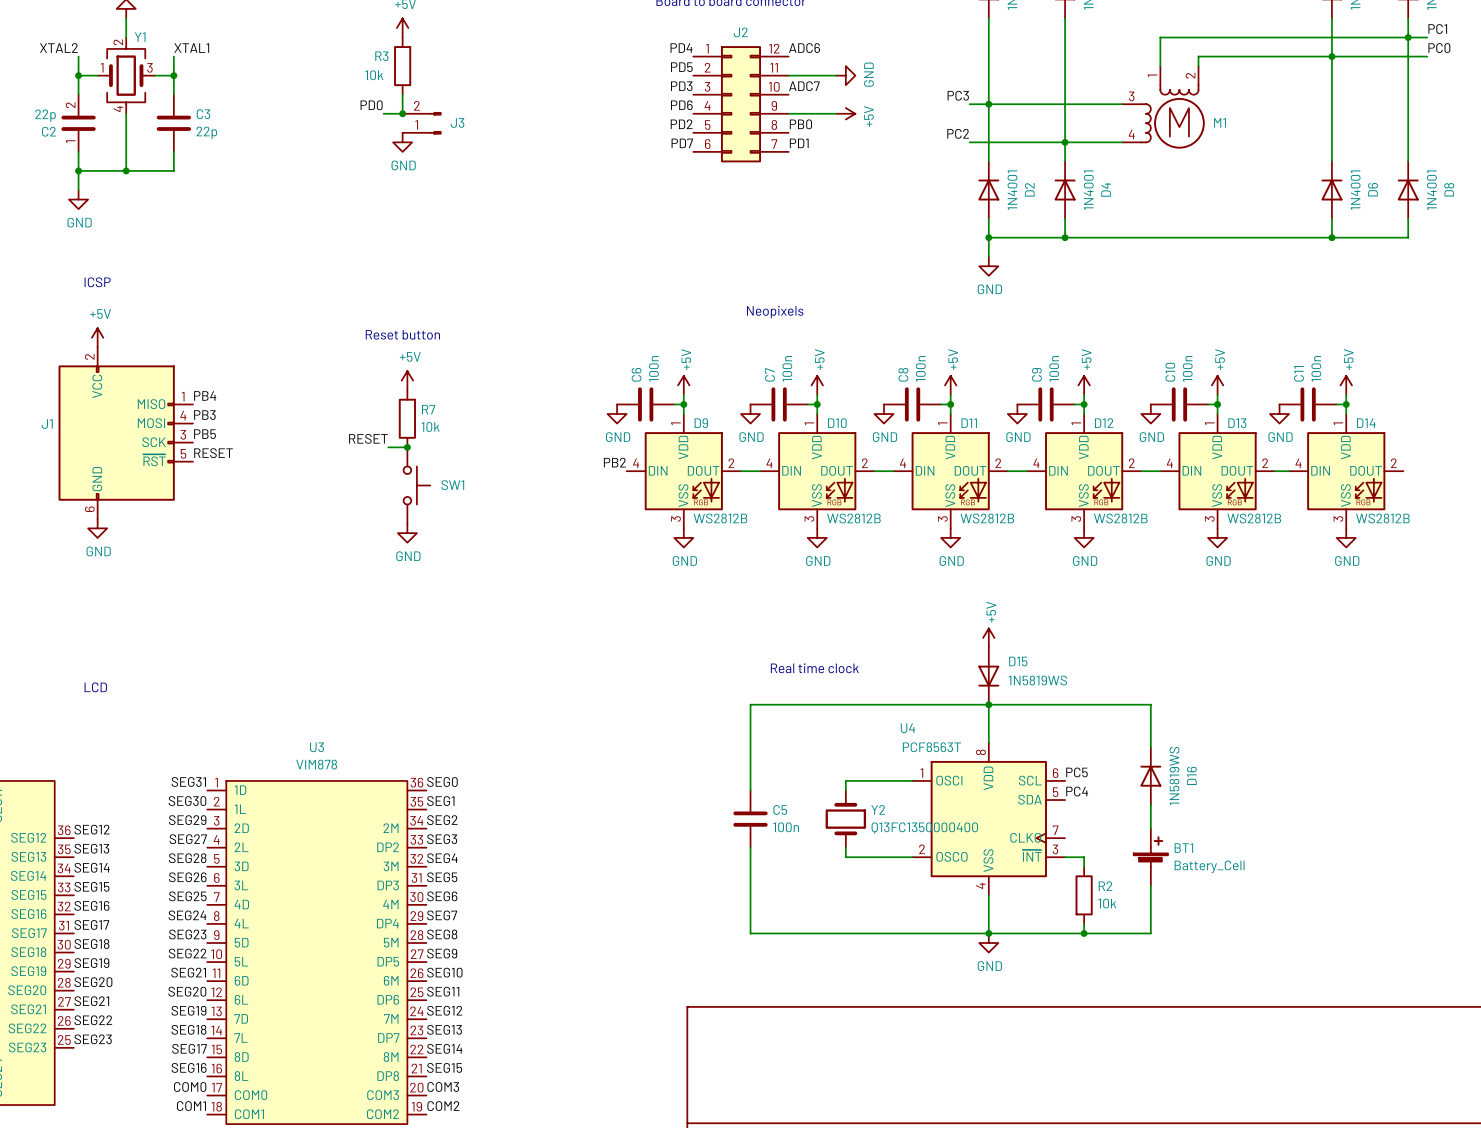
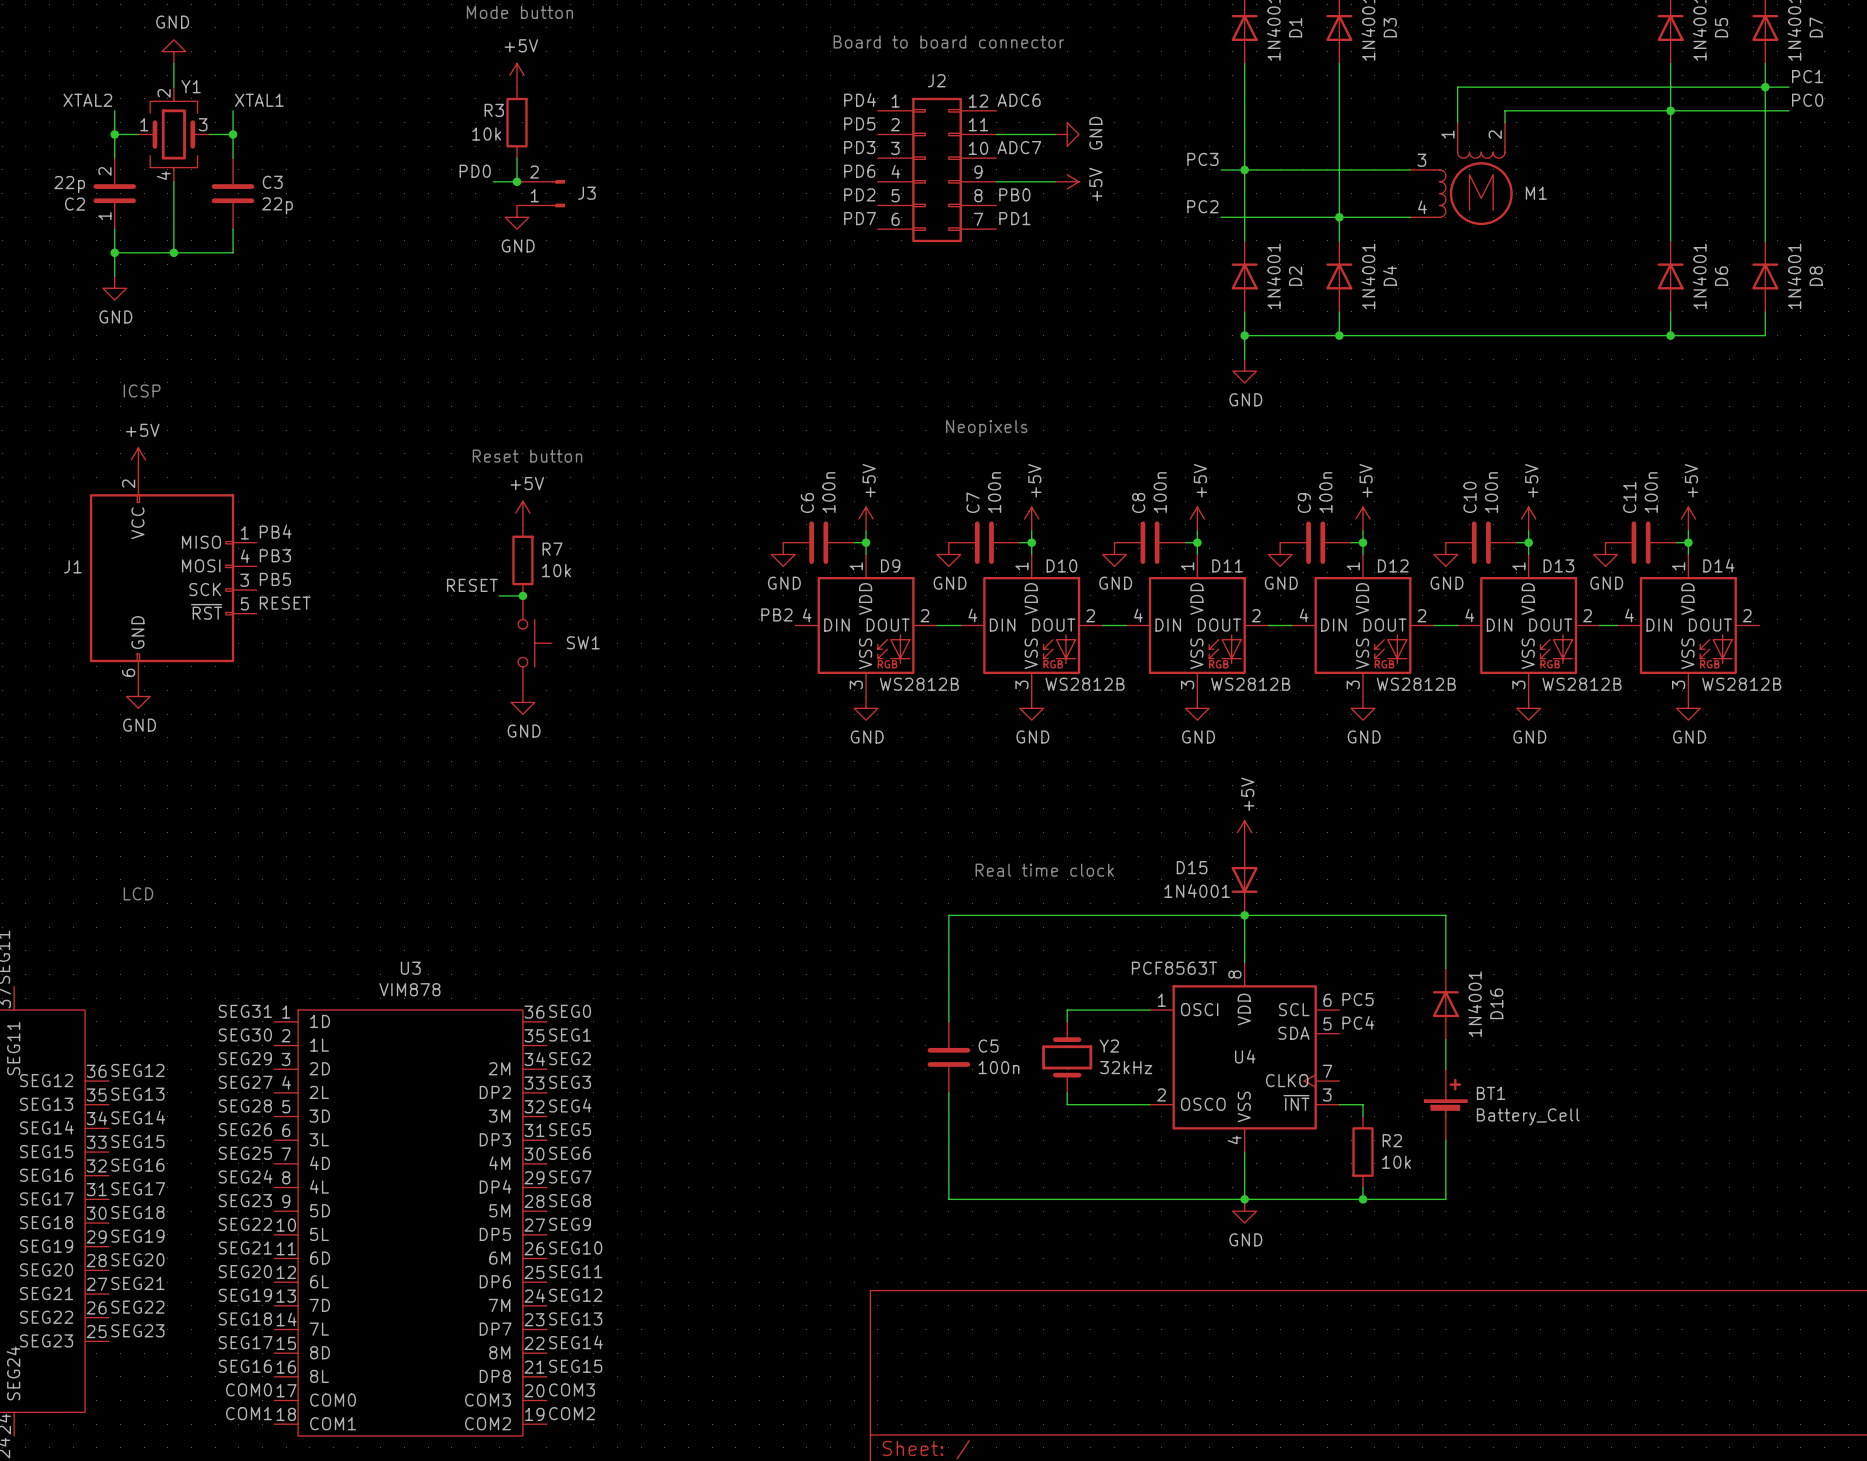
D15 name position: D15 (1018, 661) -> D15 (1192, 867)
D15 value: 1N5819WS (1037, 680) -> 1N4001 (1197, 891)
U4 name position: U4 (907, 728) -> U4 (1245, 1056)
D16 value: 1N5819WS (1174, 776) -> 1N4001 (1474, 1004)
Y2 value: Q13FC1350000400 (924, 828) -> 32kHz (1126, 1067)

